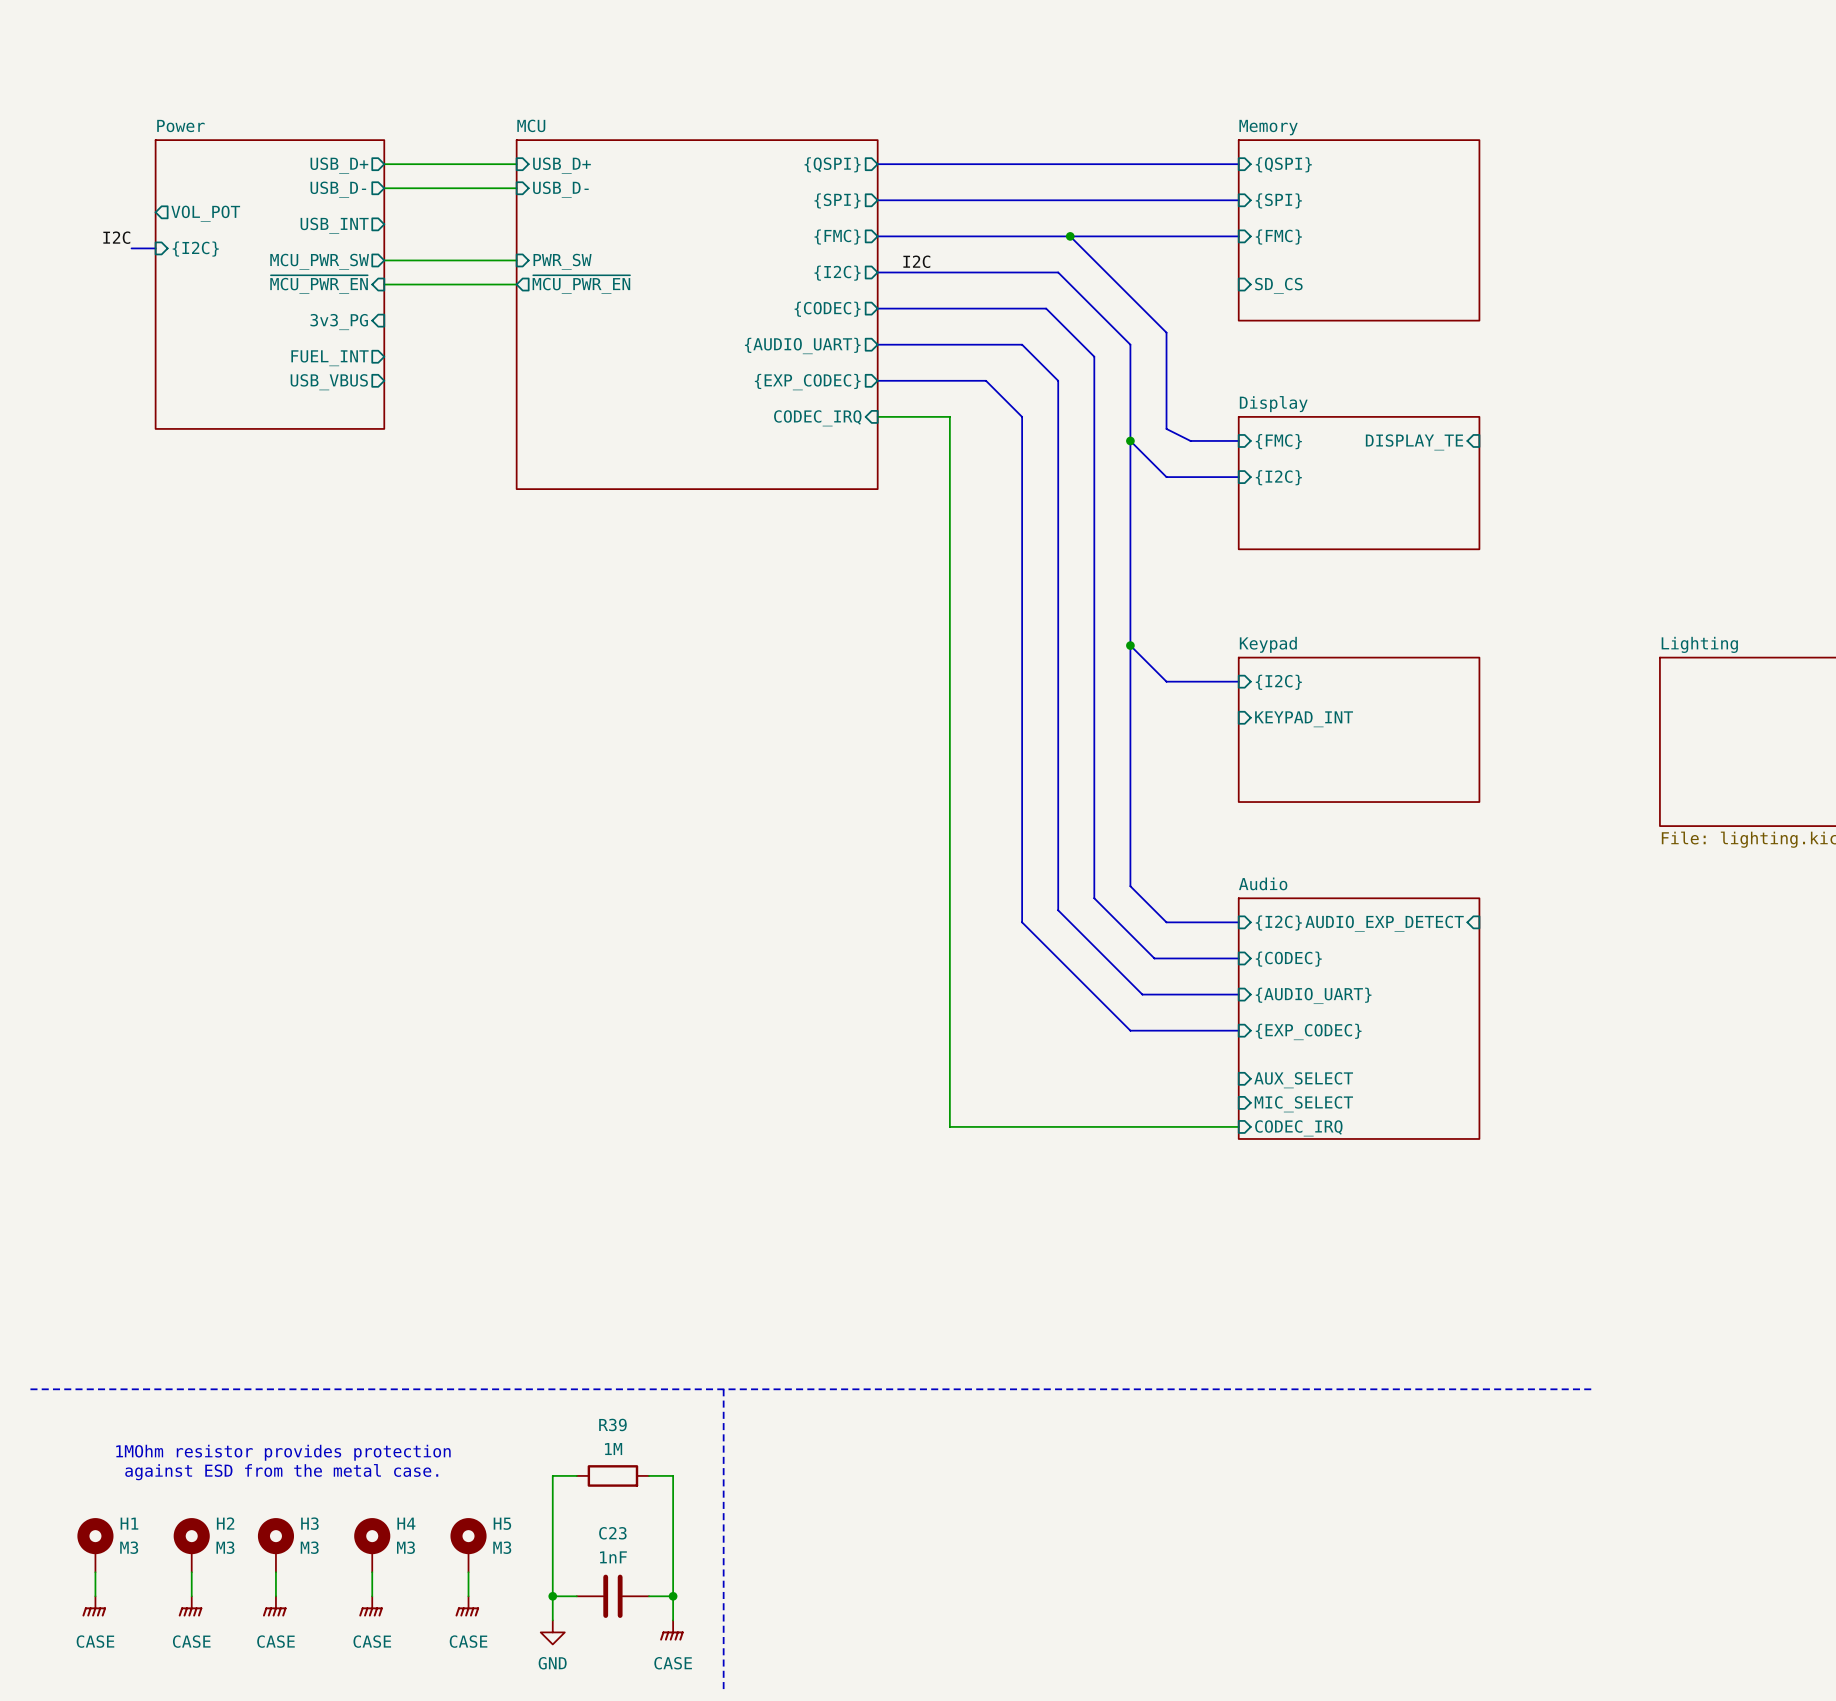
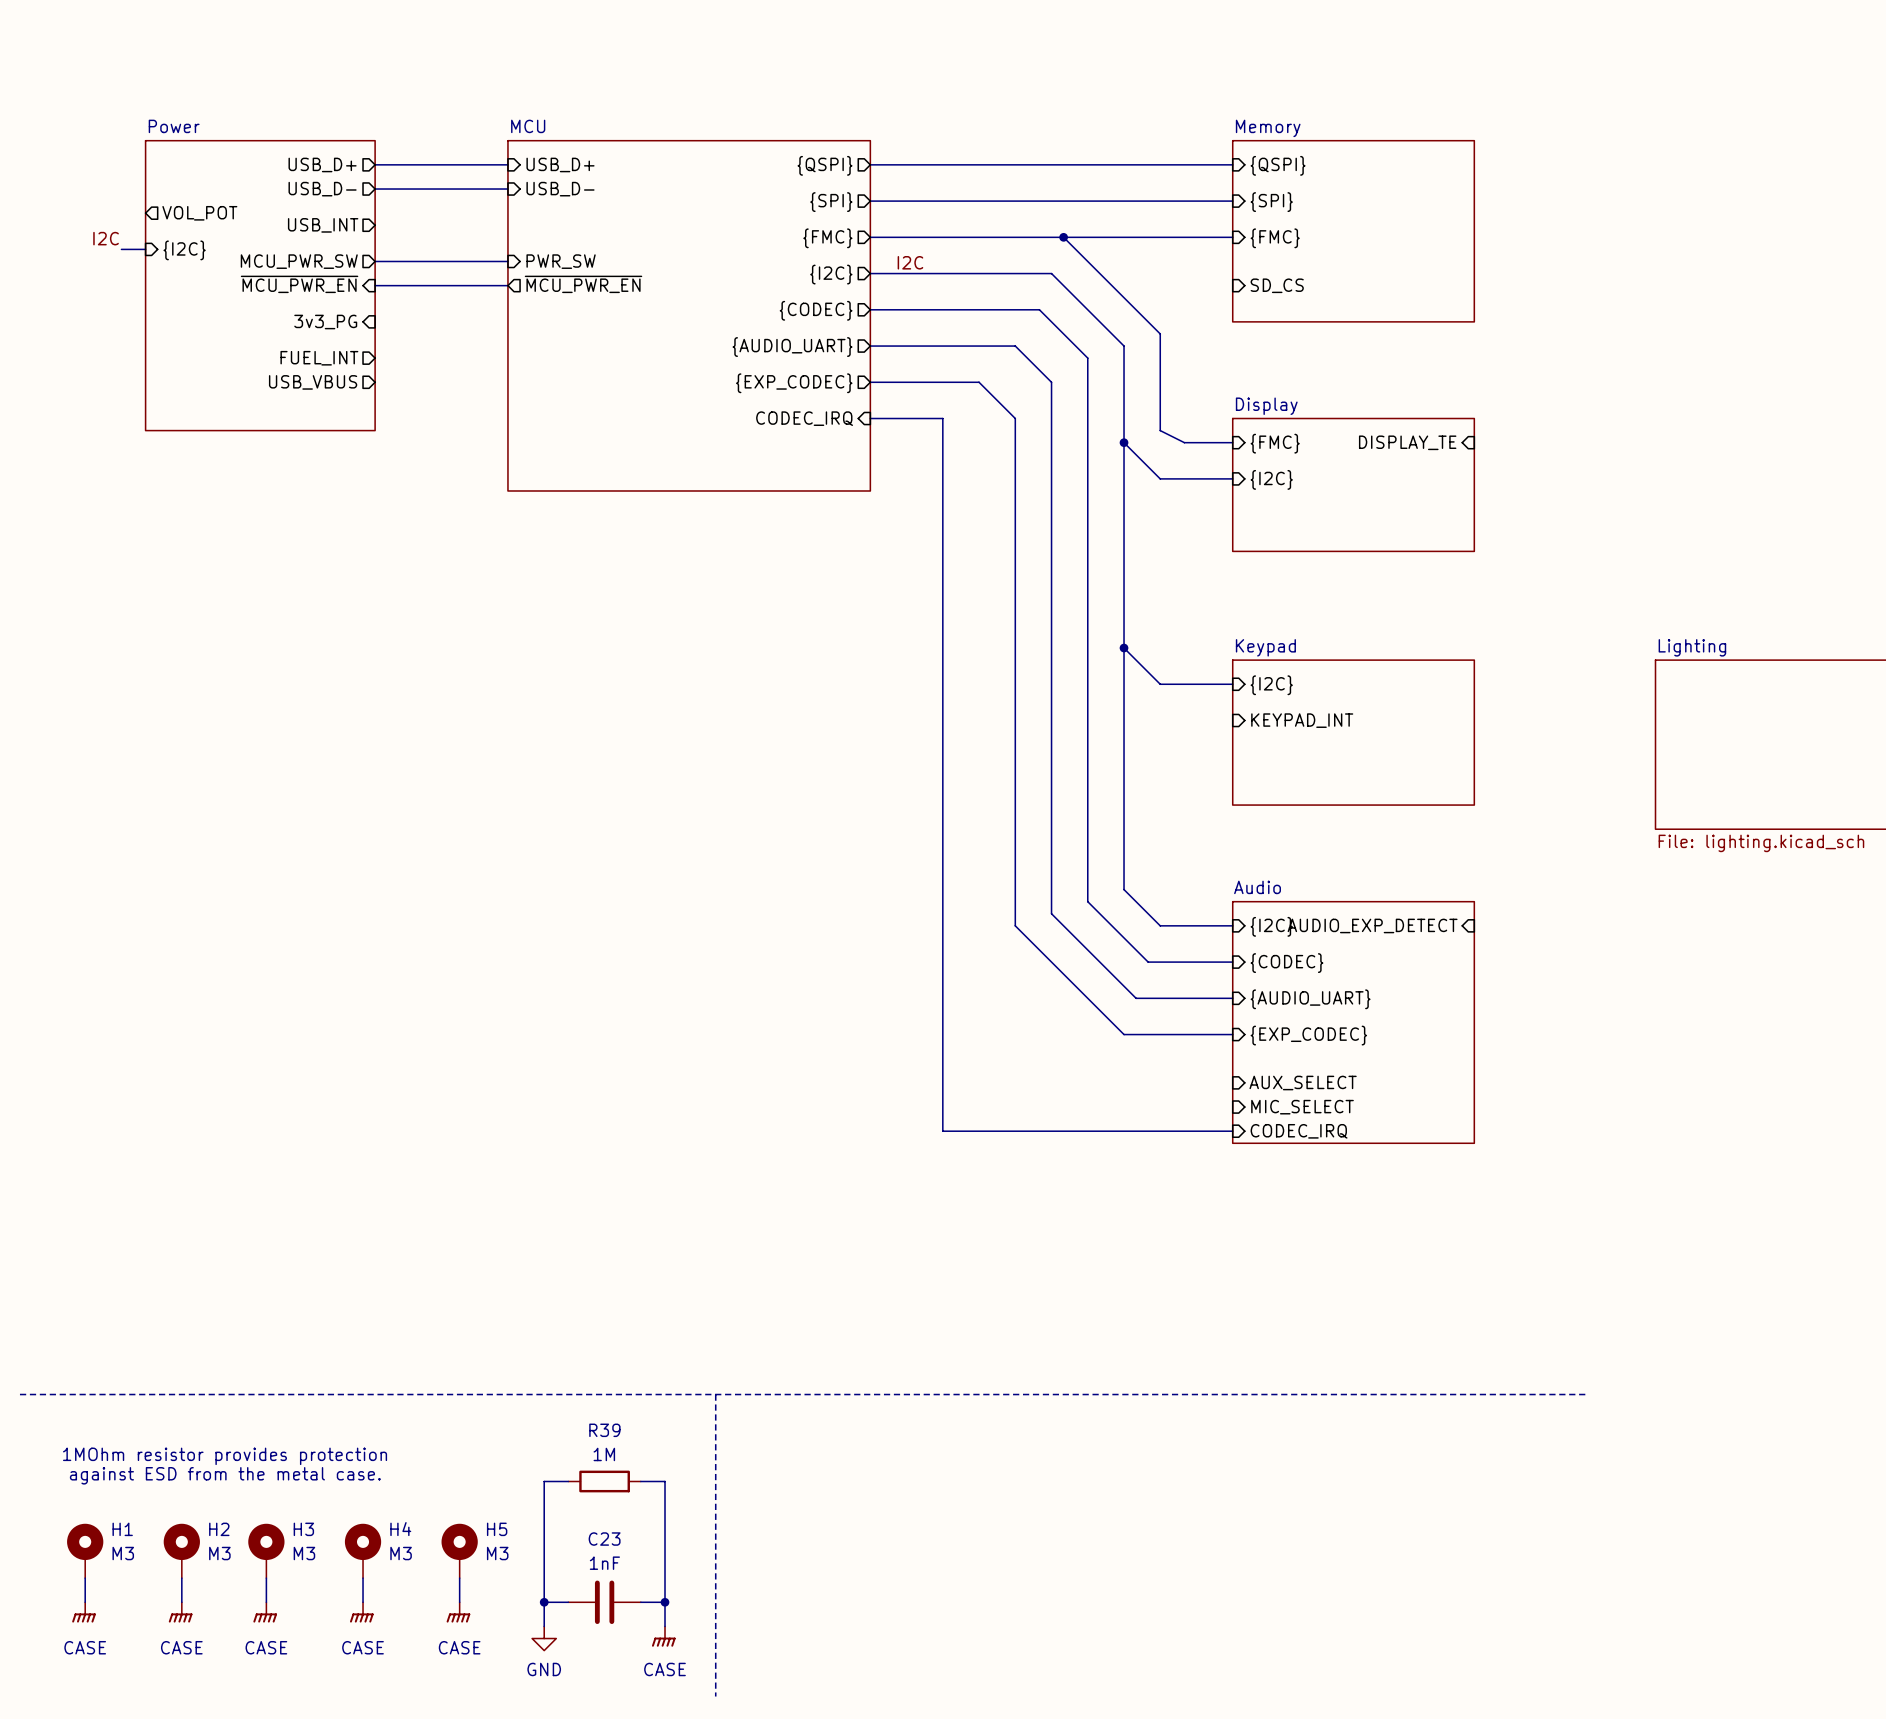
text position: 1MOhm resistor provides protection (283, 1452) -> 1MOhm resistor provides protection (225, 1456)
text position: against ESD from the metal case. (281, 1472) -> against ESD from the metal case. (225, 1475)

